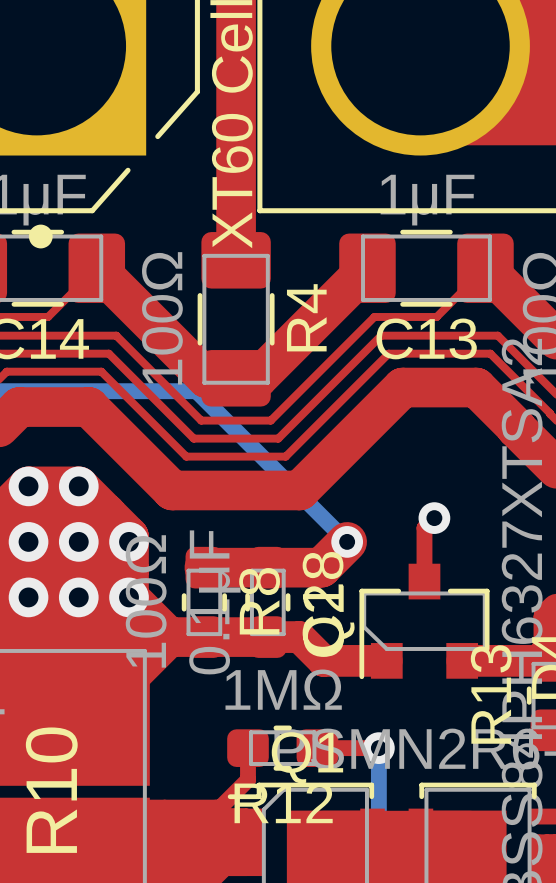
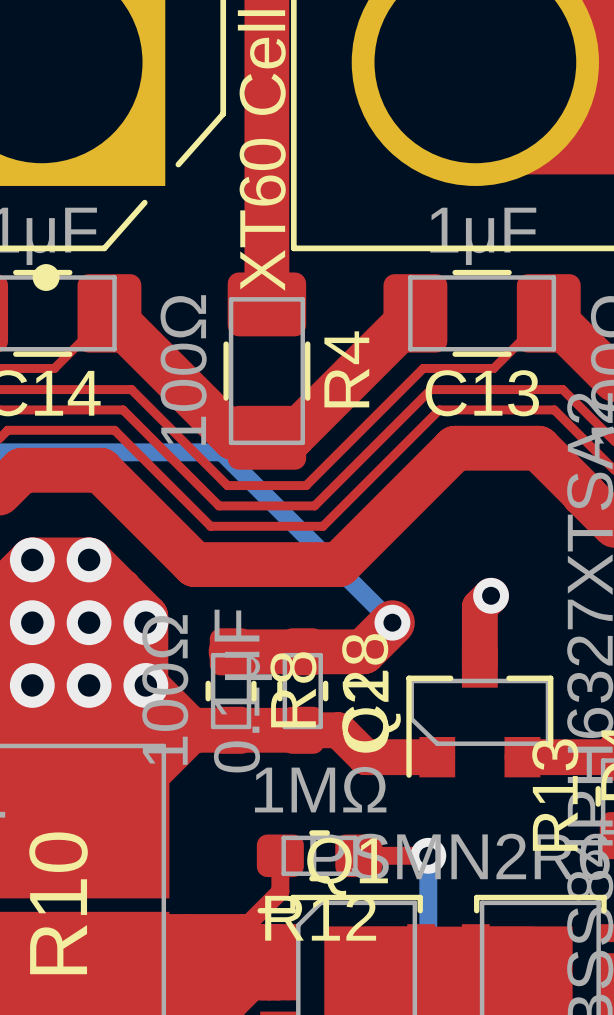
top track width: thin (434, 518) (424, 528) (424, 581) -> thick (491, 595) (479, 607) (479, 667)

